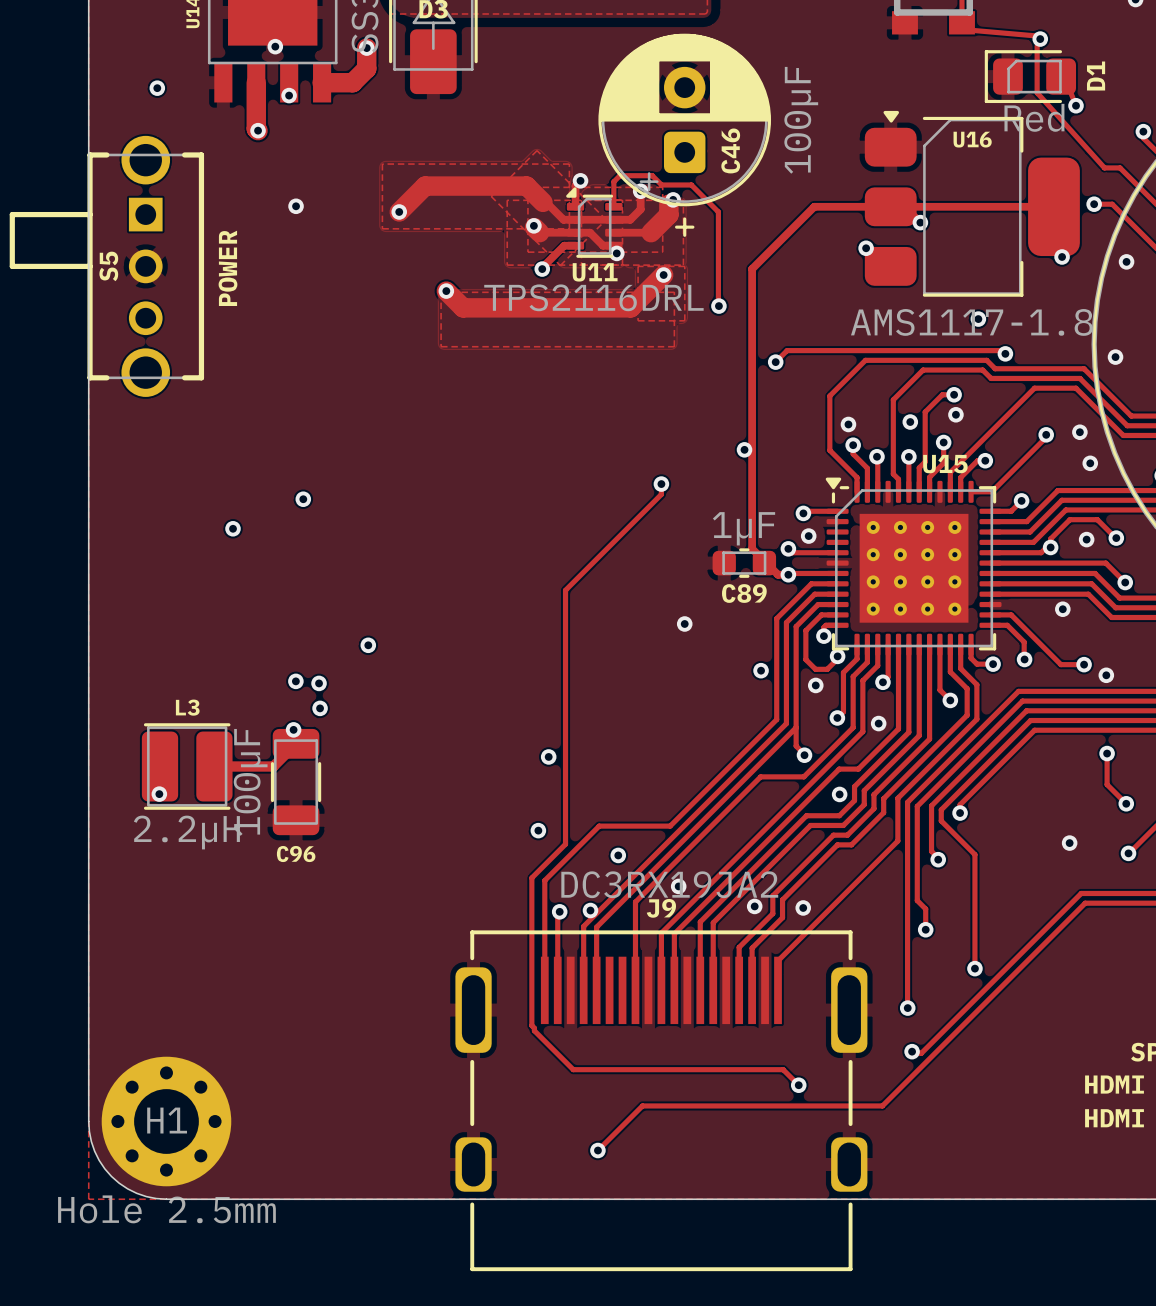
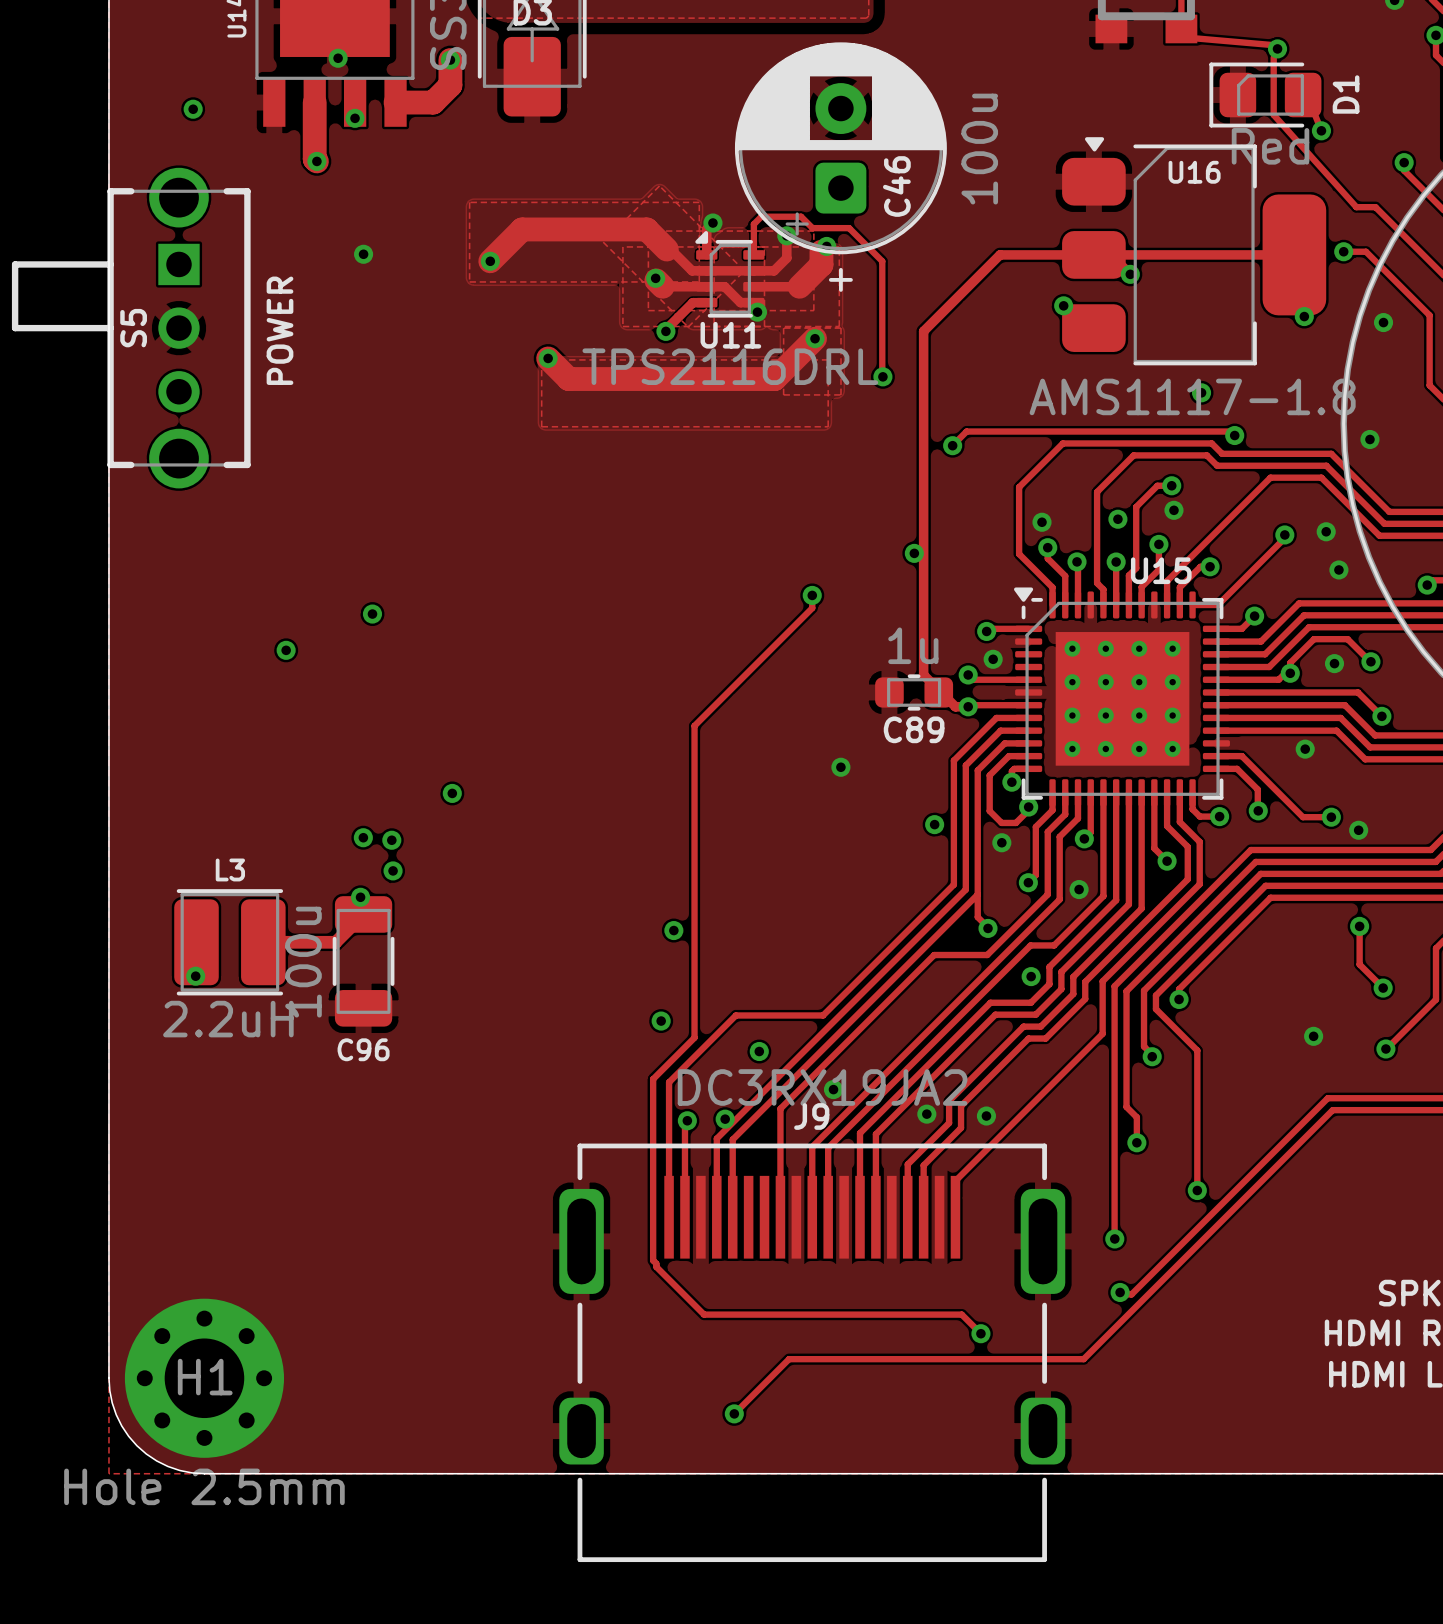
C46 value: 100µF (801, 120) -> 100u (979, 149)
C89 value: 1µF (744, 528) -> 1u (913, 645)
C96 value: 100µF (250, 782) -> 100u (303, 962)
L3 value: 2.2µH (186, 832) -> 2.2uH (228, 1019)

